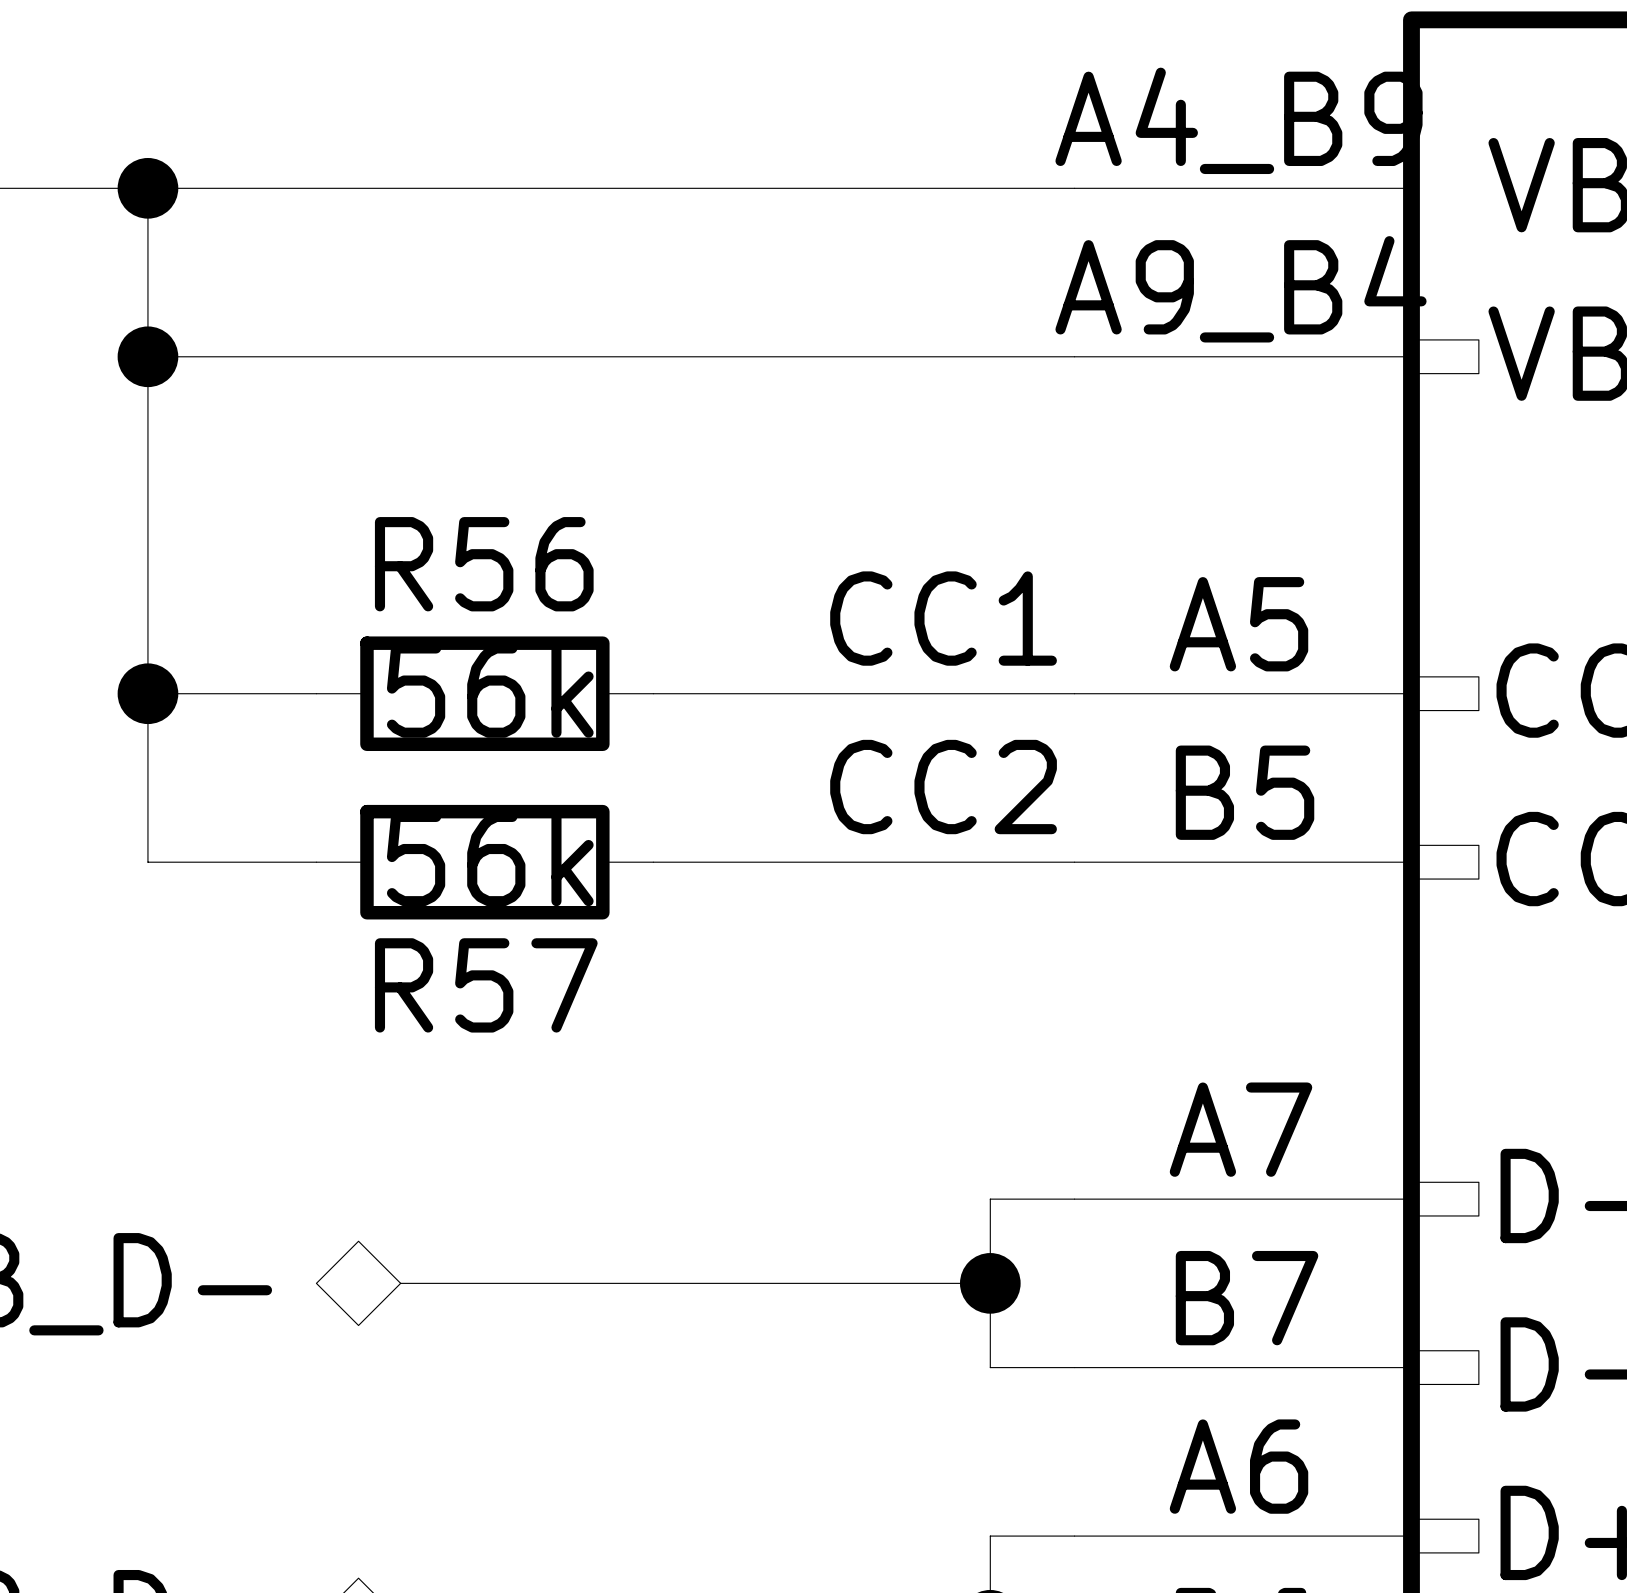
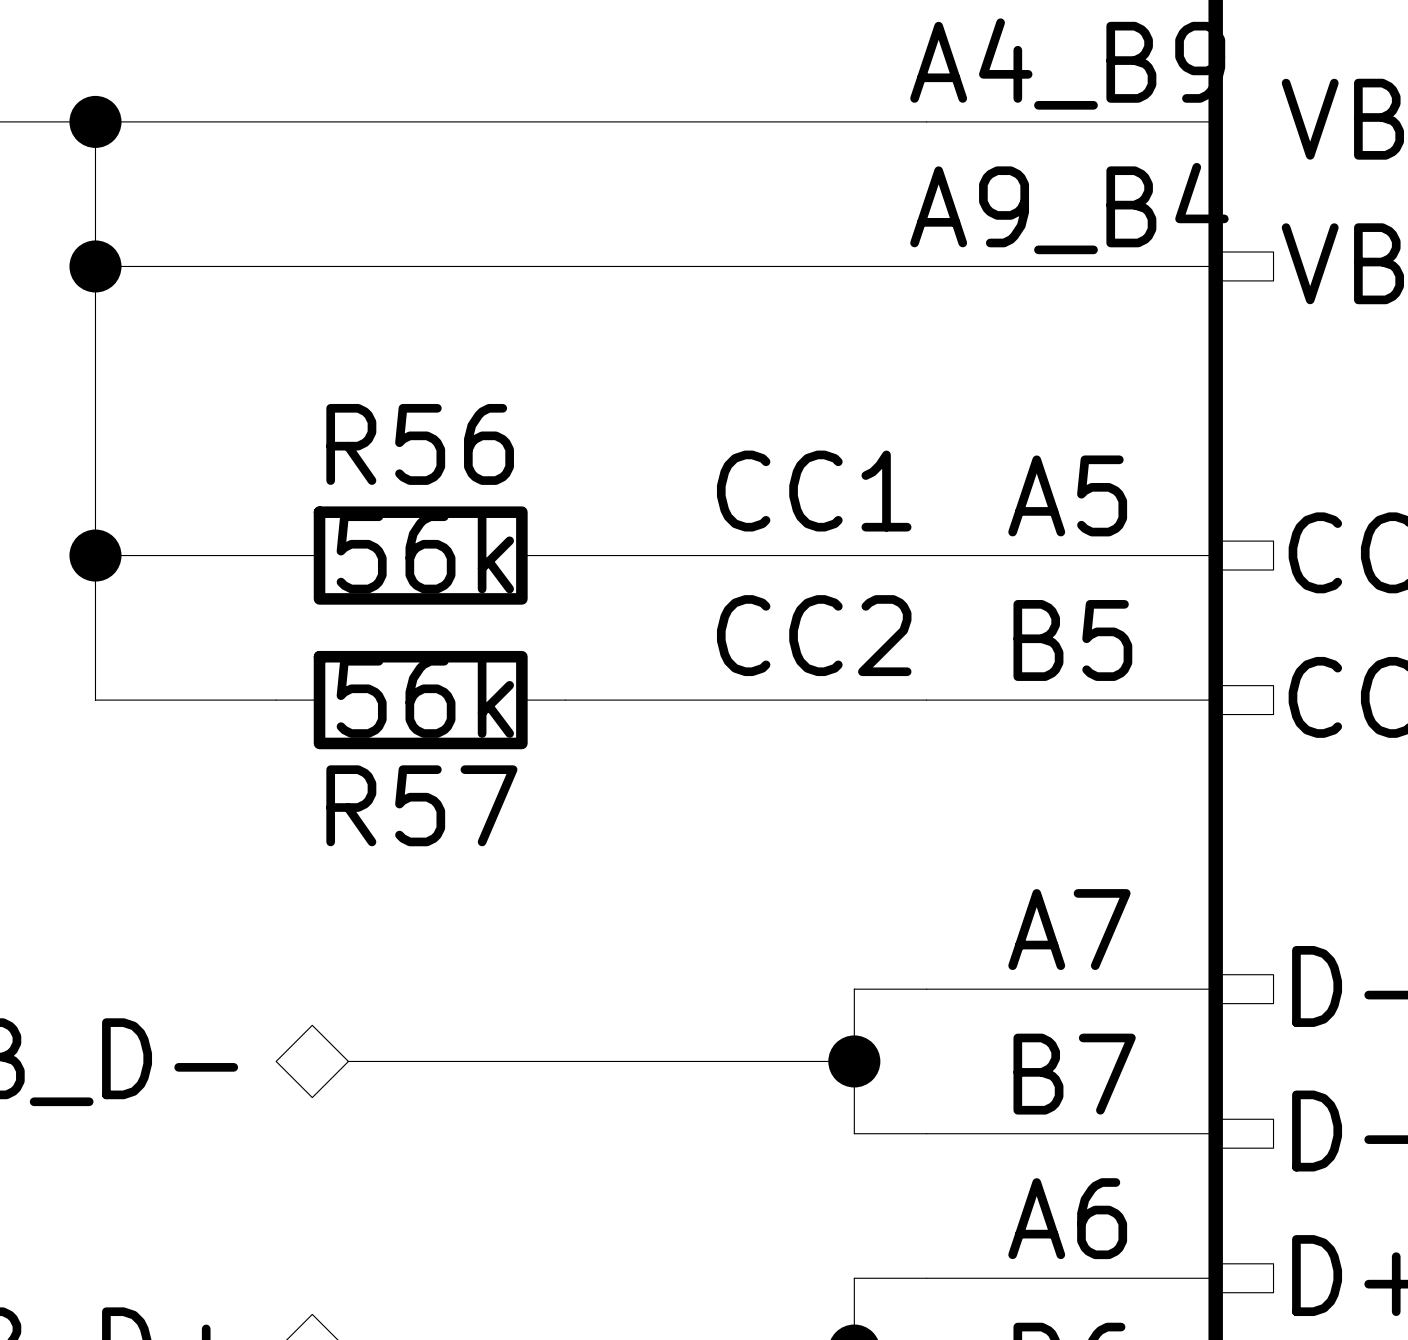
wire: (147, 188) (147, 862) -> (95, 121) (95, 700) (131, 700)
junction position: (147, 188) -> (95, 121)
junction position: (147, 356) -> (95, 266)
junction position: (147, 693) -> (95, 555)

